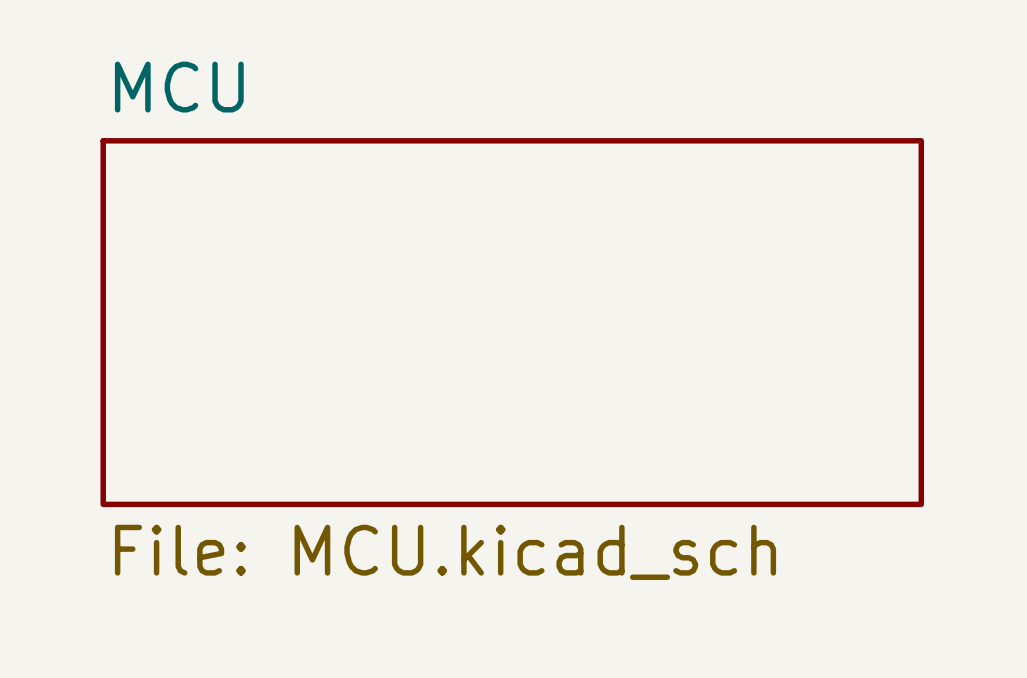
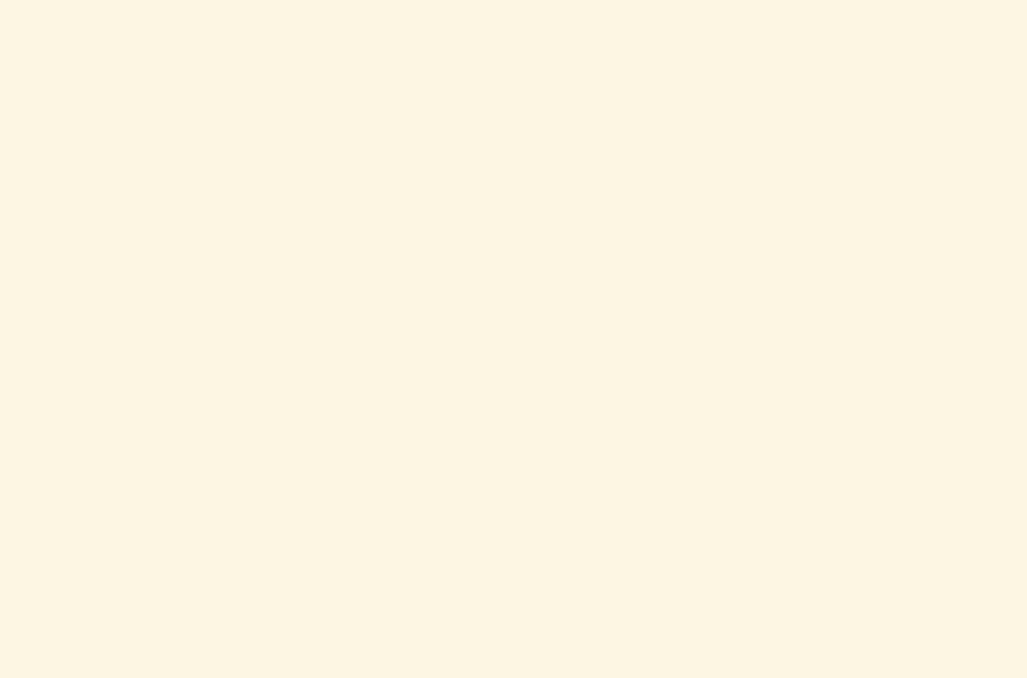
sheet MCU: File: MCU.kicad_sch (512, 322) -> none

